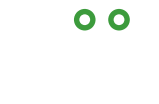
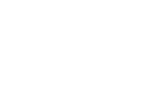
part: (101, 19) -> none

